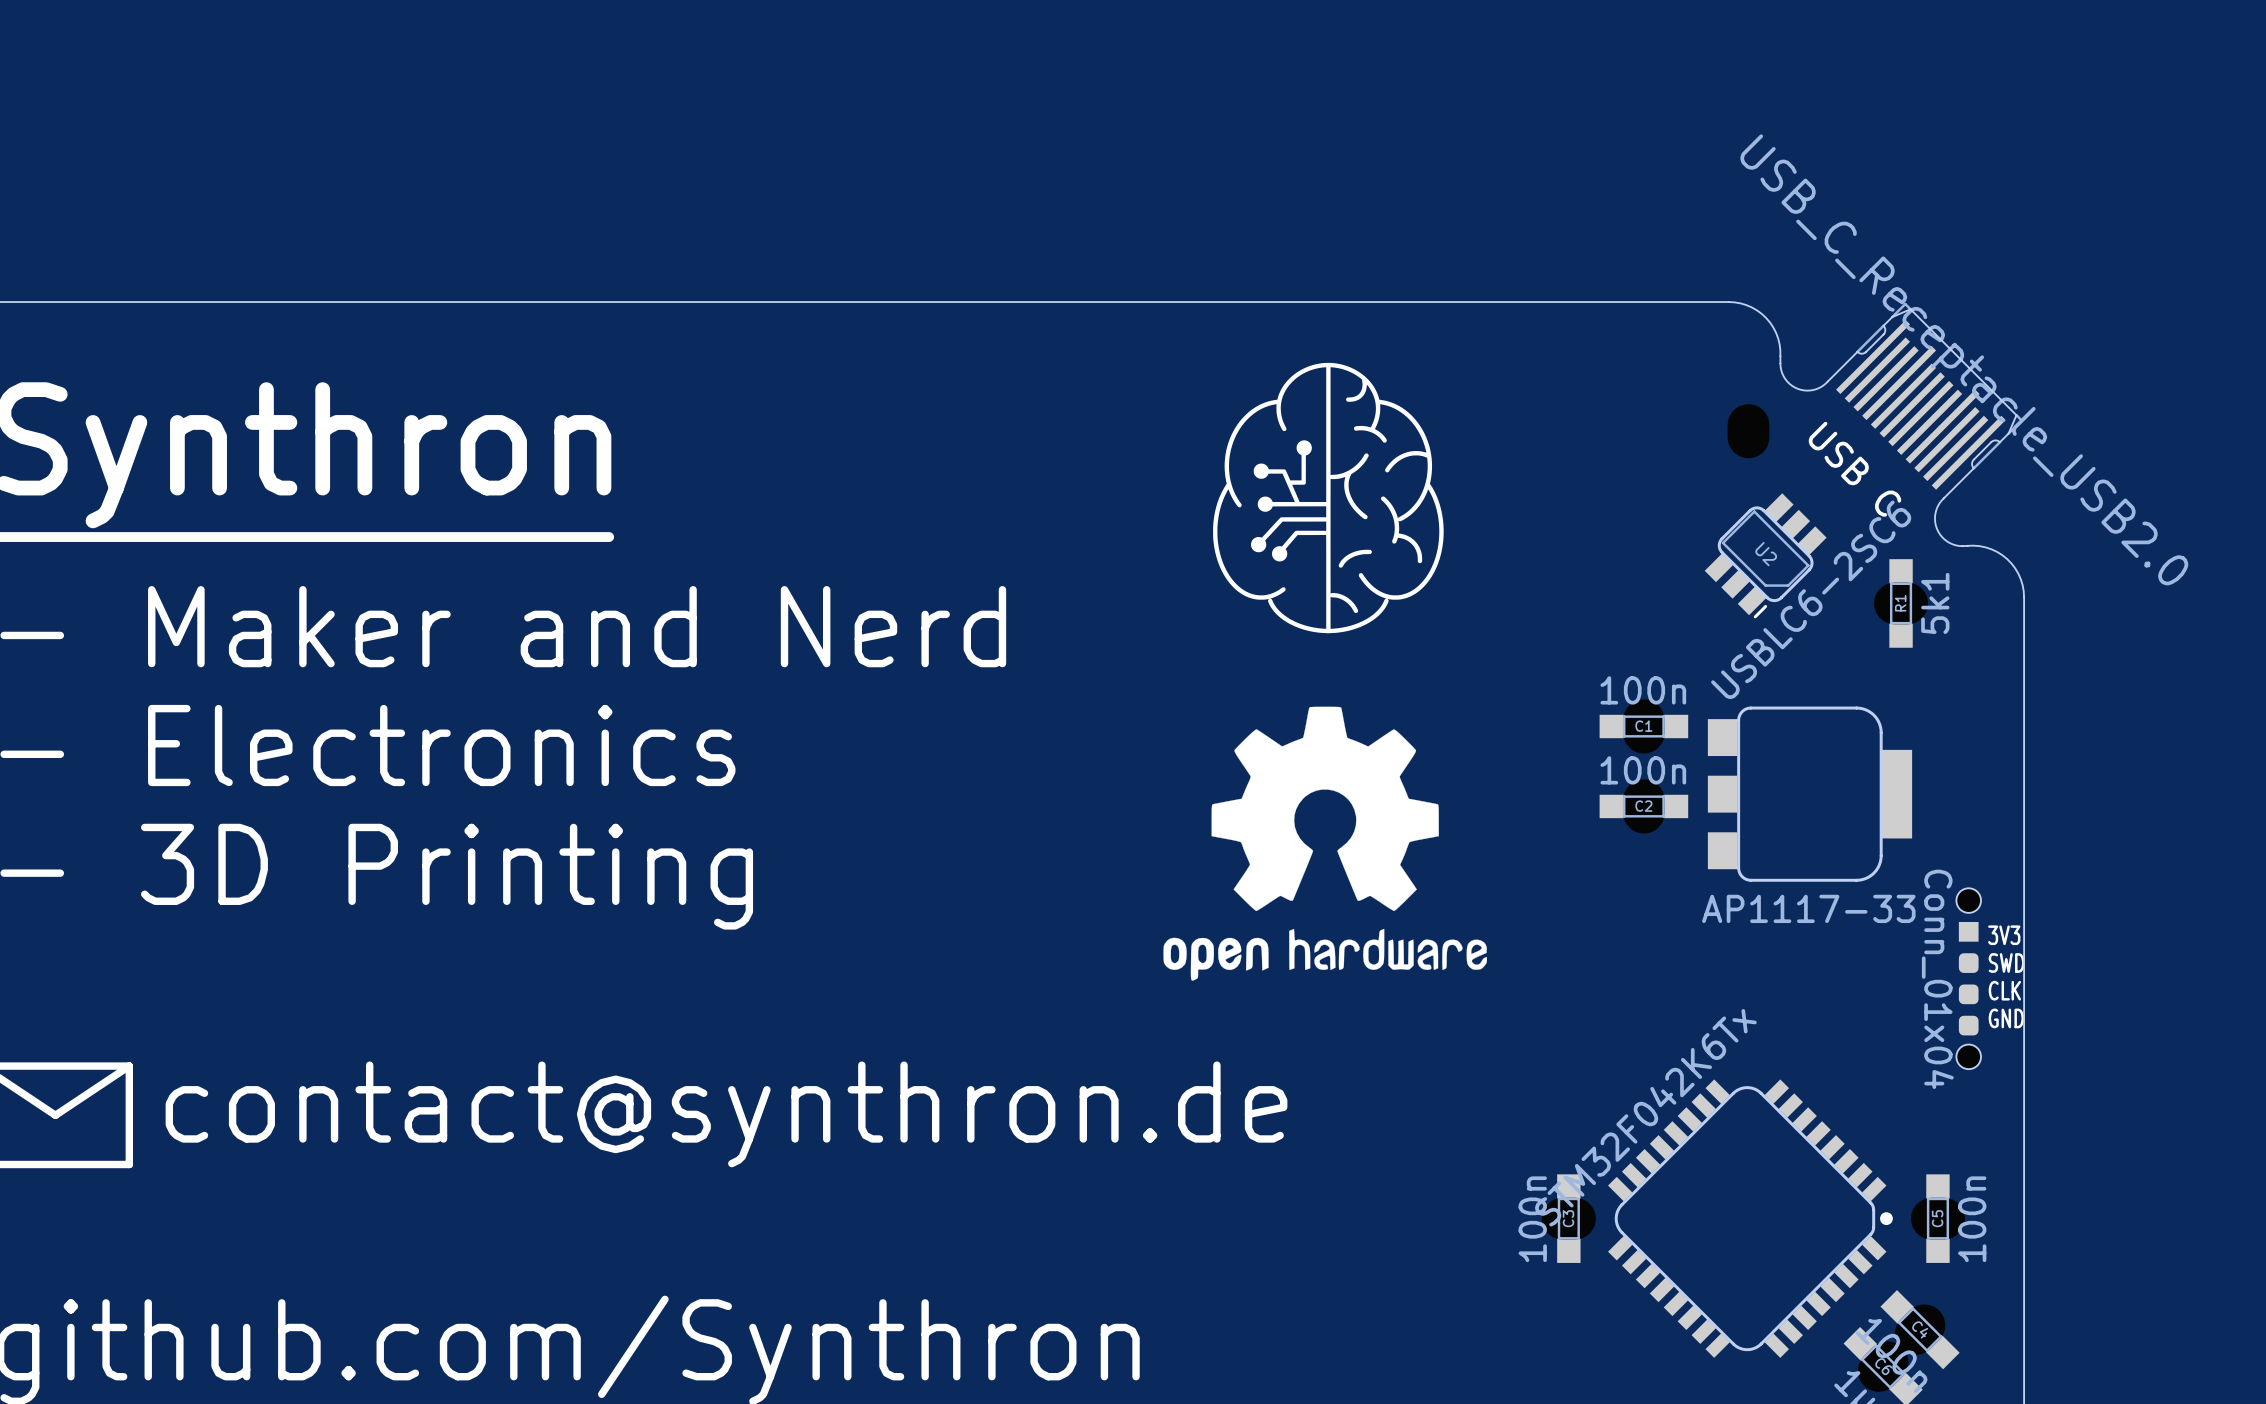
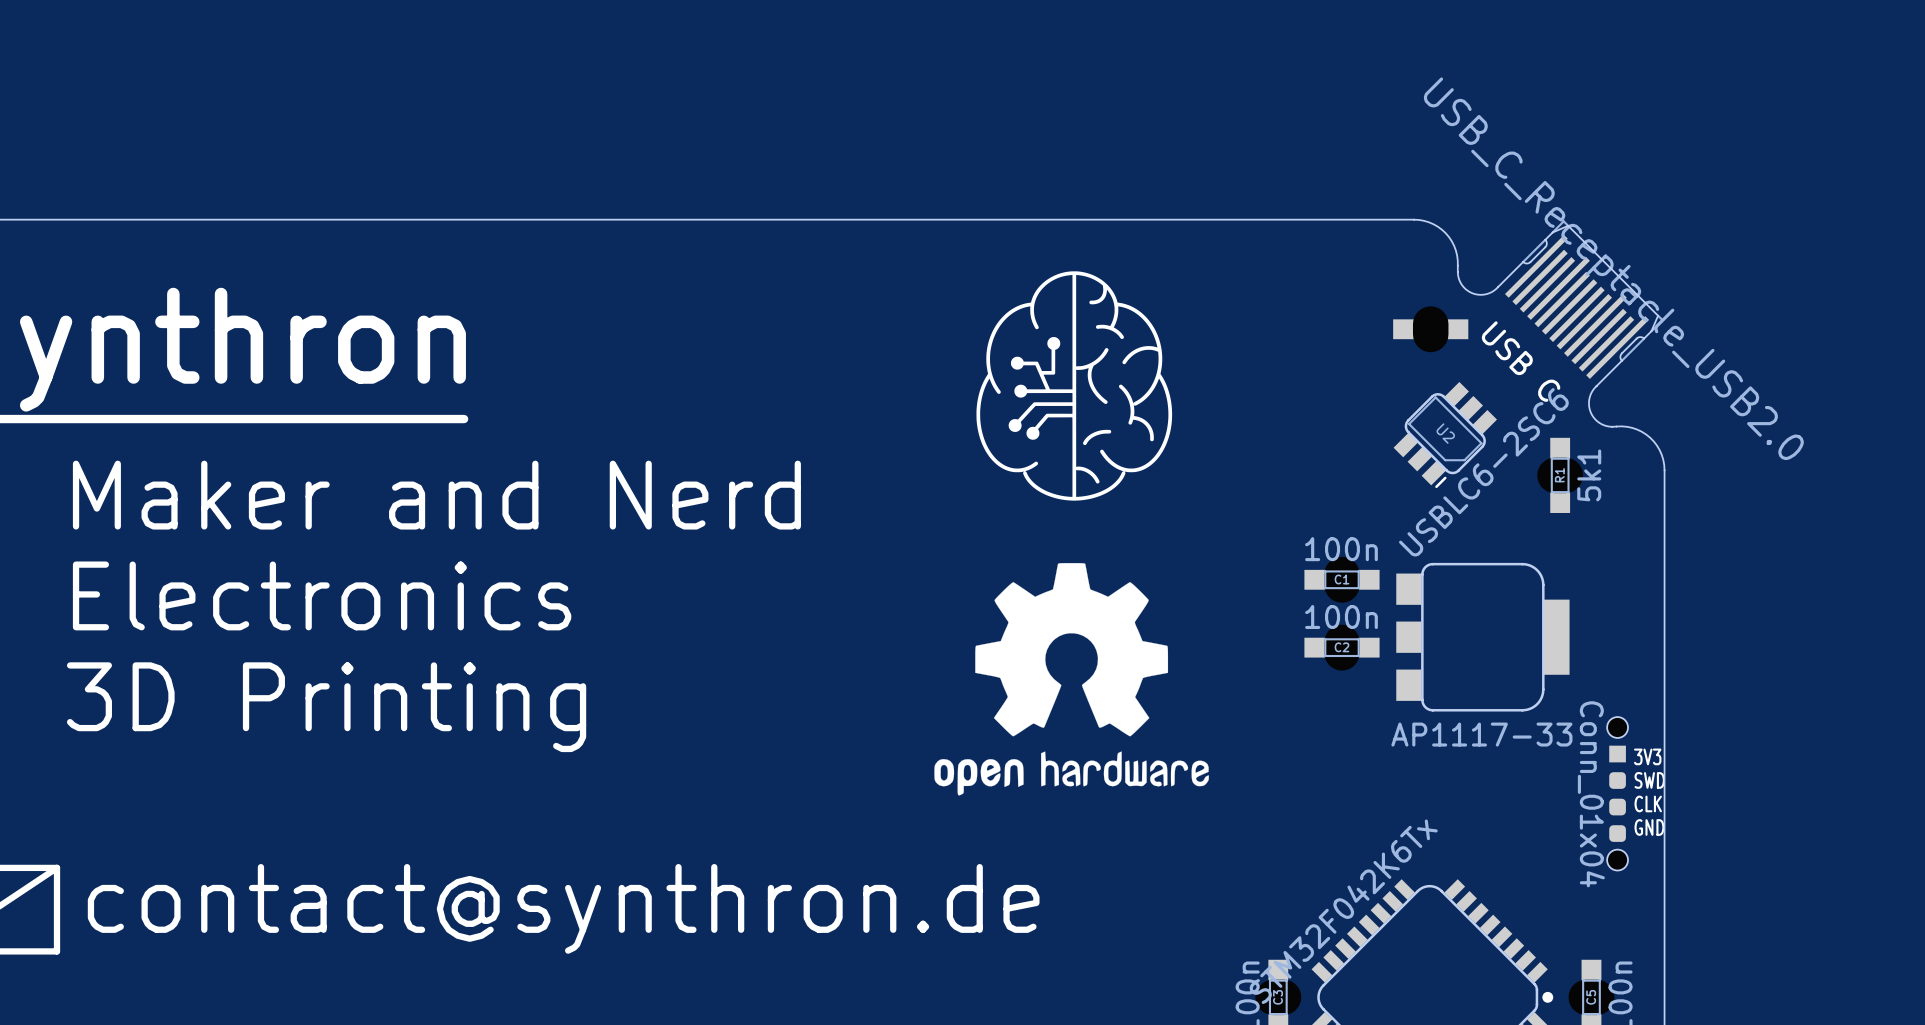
part footprint: [1727, 404, 1770, 459] -> [1393, 306, 1469, 353]

